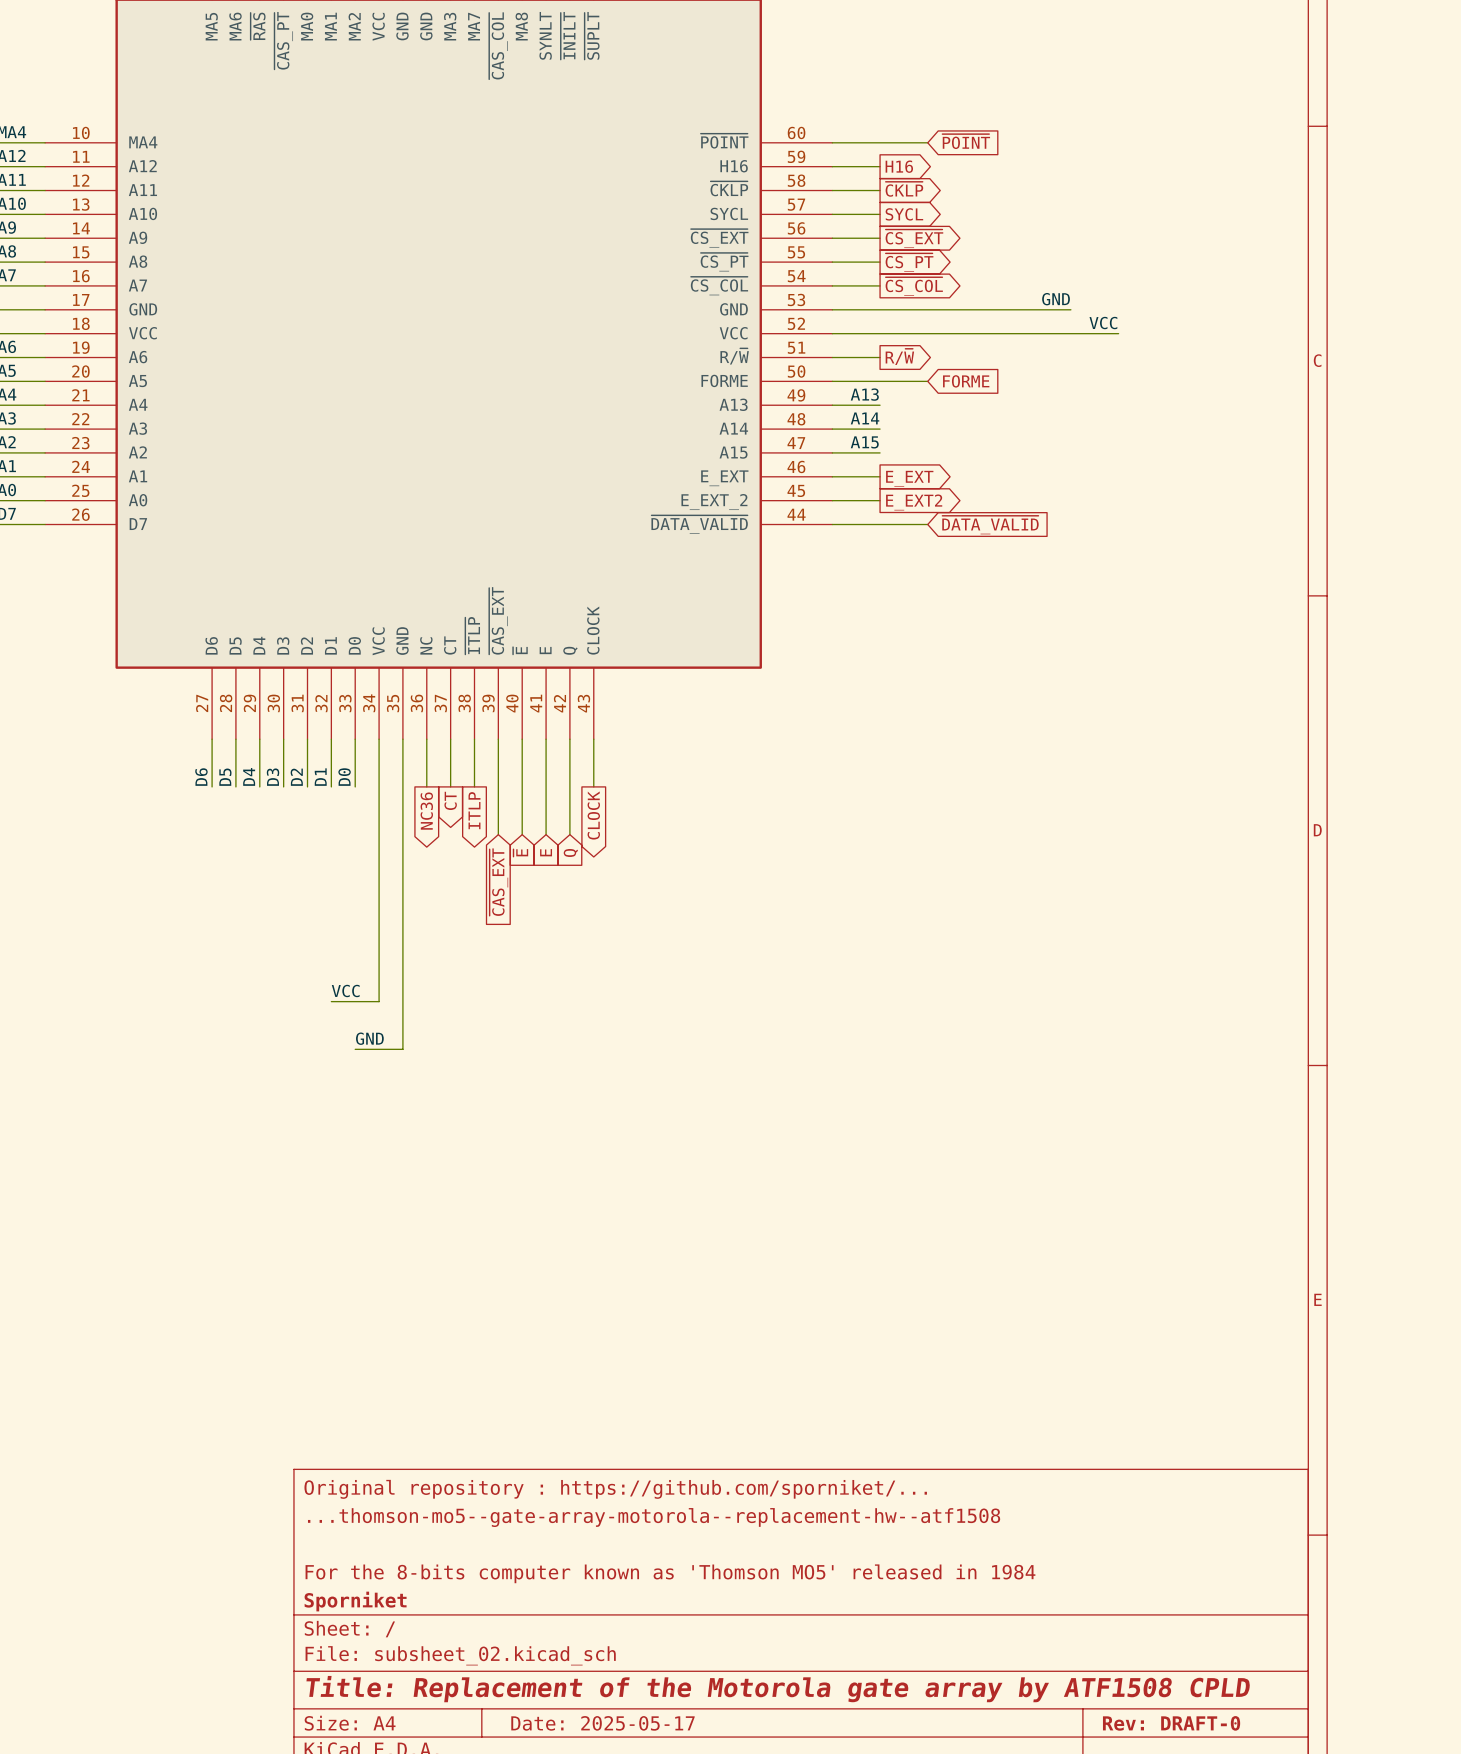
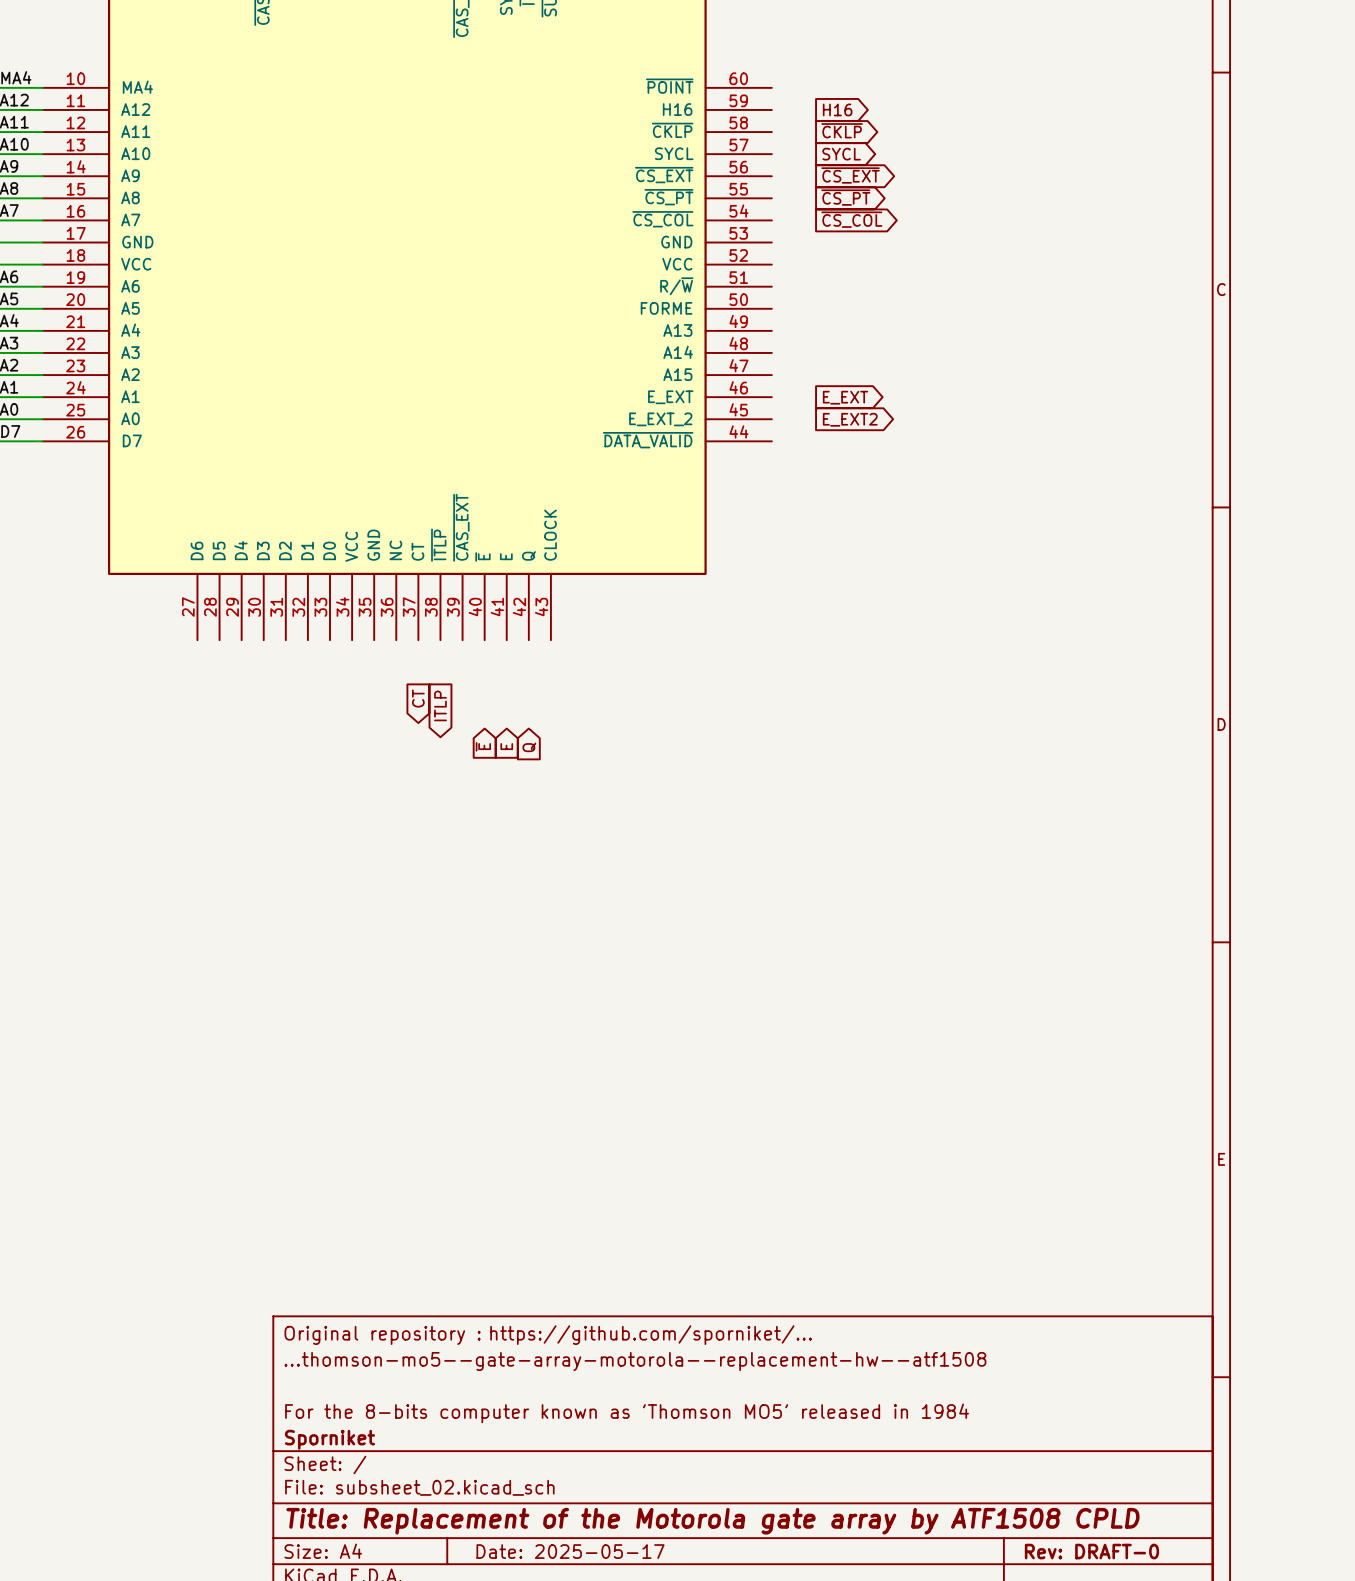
global label: ~{POINT} (966, 141) -> none
wire: (832, 142) (927, 142) -> none
wire: (832, 166) (880, 166) -> none
wire: (832, 190) (880, 190) -> none
wire: (832, 214) (880, 214) -> none
wire: (832, 238) (880, 238) -> none
wire: (832, 262) (880, 262) -> none
wire: (832, 285) (880, 285) -> none
label: GND (1056, 299) -> none
wire: (832, 309) (1070, 309) -> none
label: VCC (1103, 323) -> none
wire: (832, 333) (1118, 333) -> none
global label: R/~{W} (899, 356) -> none
wire: (832, 357) (880, 357) -> none
wire: (832, 381) (927, 381) -> none
global label: FORME (966, 381) -> none
label: A13 (864, 394) -> none
wire: (832, 405) (880, 405) -> none
label: A14 (865, 418) -> none
wire: (832, 429) (880, 429) -> none
label: A15 (864, 442) -> none
wire: (832, 452) (880, 452) -> none
wire: (832, 476) (880, 476) -> none
wire: (832, 500) (880, 500) -> none
wire: (832, 524) (927, 524) -> none
global label: ~{DATA_VALID} (990, 525) -> none
wire: (212, 739) (212, 786) -> none
wire: (235, 739) (235, 786) -> none
wire: (259, 739) (259, 786) -> none
wire: (283, 739) (283, 786) -> none
wire: (307, 739) (307, 786) -> none
wire: (331, 739) (331, 786) -> none
wire: (355, 739) (355, 786) -> none
wire: (379, 739) (379, 1001) (331, 1001) -> none
wire: (402, 739) (402, 1049) (355, 1049) -> none
wire: (426, 739) (426, 786) -> none
wire: (450, 739) (450, 786) -> none
wire: (474, 739) (474, 786) -> none
wire: (498, 739) (498, 834) -> none
wire: (522, 739) (522, 834) -> none
wire: (546, 739) (546, 834) -> none
wire: (569, 739) (569, 834) -> none
wire: (593, 739) (593, 786) -> none
label: D4 (249, 776) -> none
label: D6 (201, 777) -> none
label: D5 (225, 777) -> none
label: D3 (273, 777) -> none
label: D2 (296, 777) -> none
label: D1 (320, 777) -> none
label: D0 (344, 777) -> none
global label: NC36 (426, 811) -> none
global label: CLOCK (593, 815) -> none
global label: ~{CAS_EXT} (498, 882) -> none
label: VCC (345, 990) -> none
label: GND (369, 1038) -> none

